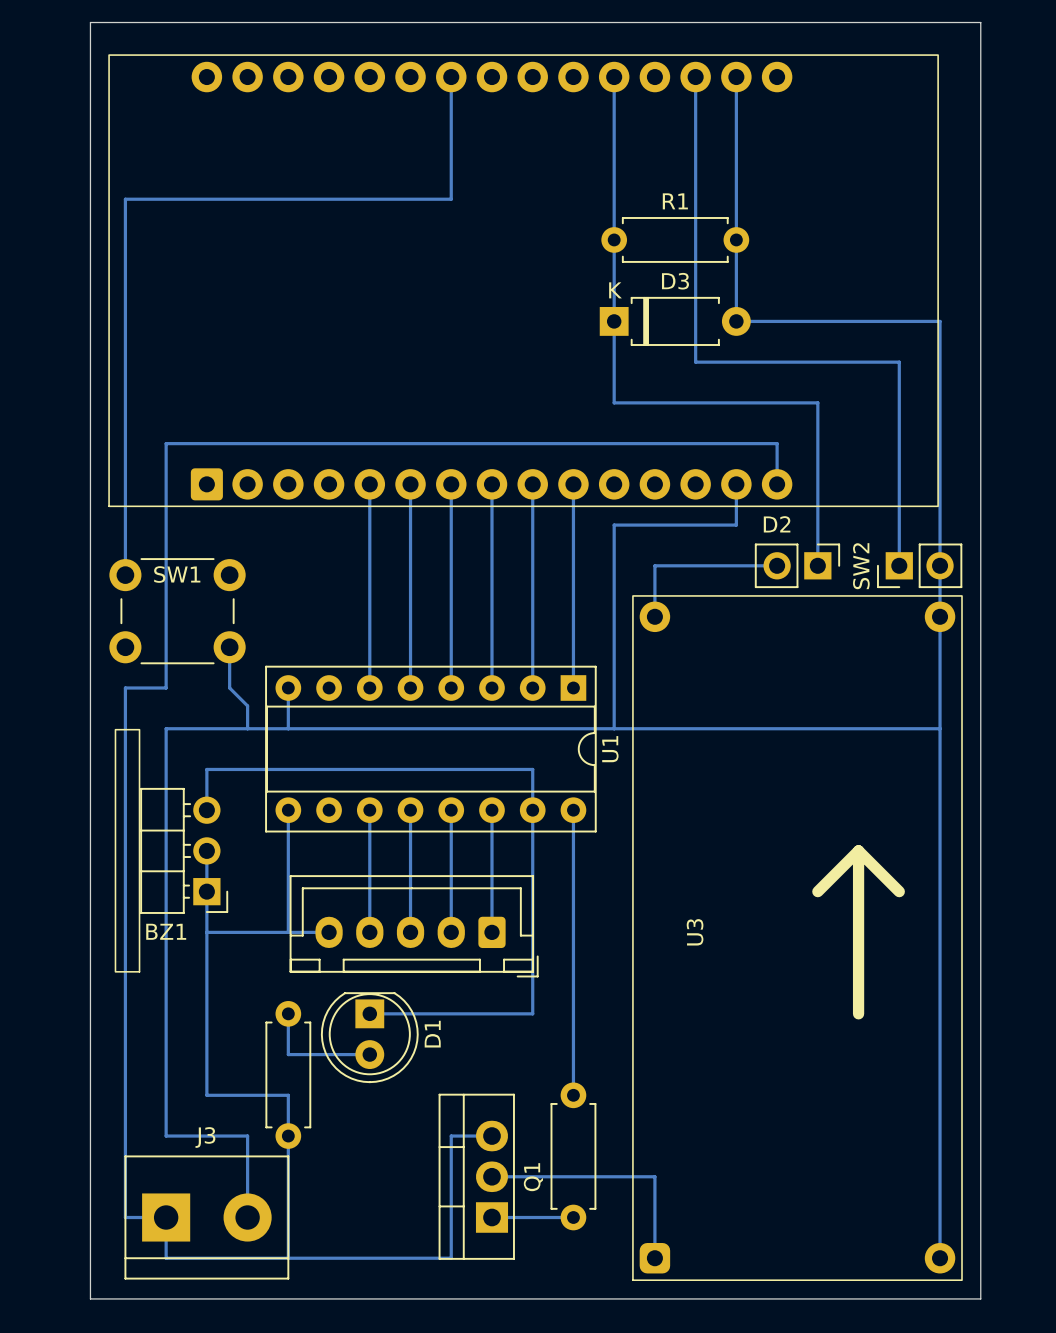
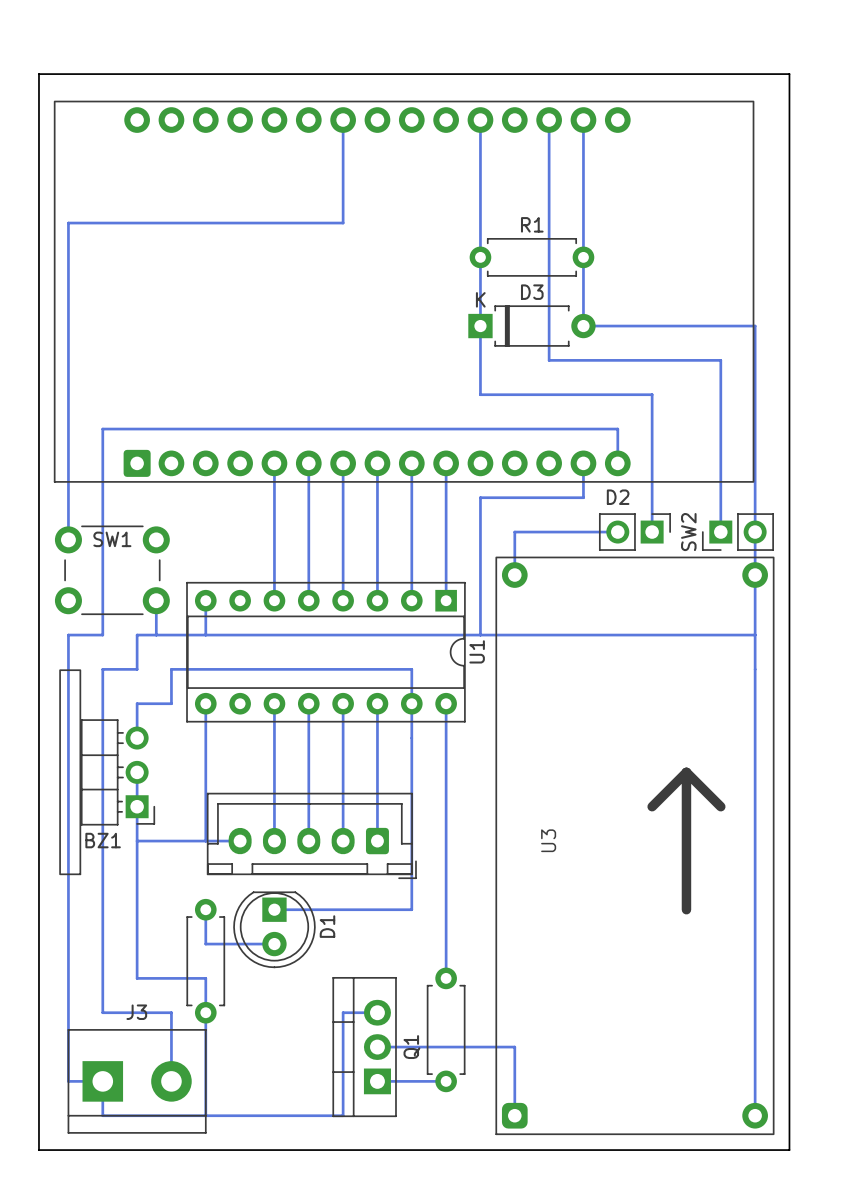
bottom track: (369, 647) (369, 688) -> (274, 703) (274, 738)
bottom track: (410, 647) (410, 688) -> (308, 703) (308, 738)
bottom track: (451, 647) (451, 688) -> (343, 703) (343, 738)
bottom track: (491, 647) (491, 688) -> (377, 703) (377, 738)
bottom track: (532, 647) (532, 688) -> none
bottom track: (573, 647) (573, 688) -> (446, 703) (446, 738)
bottom track: (229, 688) (247, 705) (247, 728) (206, 728) -> (755, 635) (137, 635) (137, 669)
bottom track: (288, 688) (288, 728) -> (205, 635) (205, 600)
bottom track: (614, 688) (614, 728) -> (205, 703) (205, 738)
bottom track: (532, 728) (940, 728) -> (411, 669) (411, 703)
U1 position: (430, 749) -> (325, 652)
bottom track: (247, 769) (532, 769) -> (171, 703) (171, 669)

